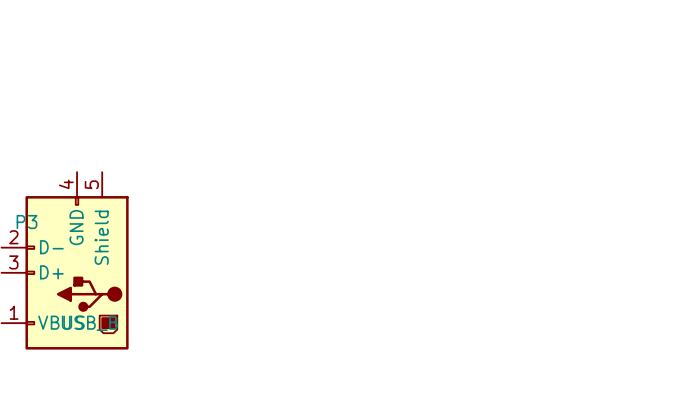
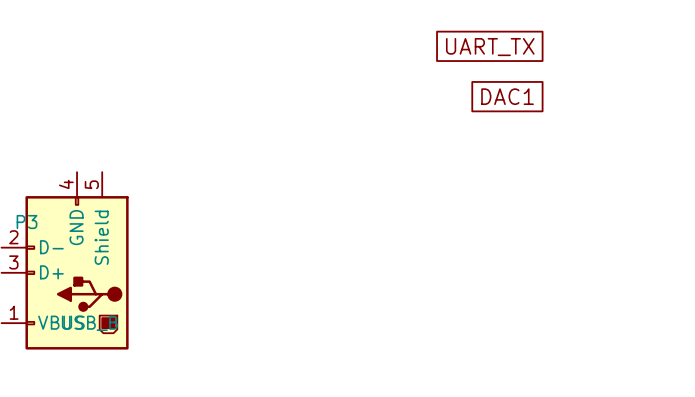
global label: none -> UART_TX (490, 47)
global label: none -> DAC1 (507, 96)

